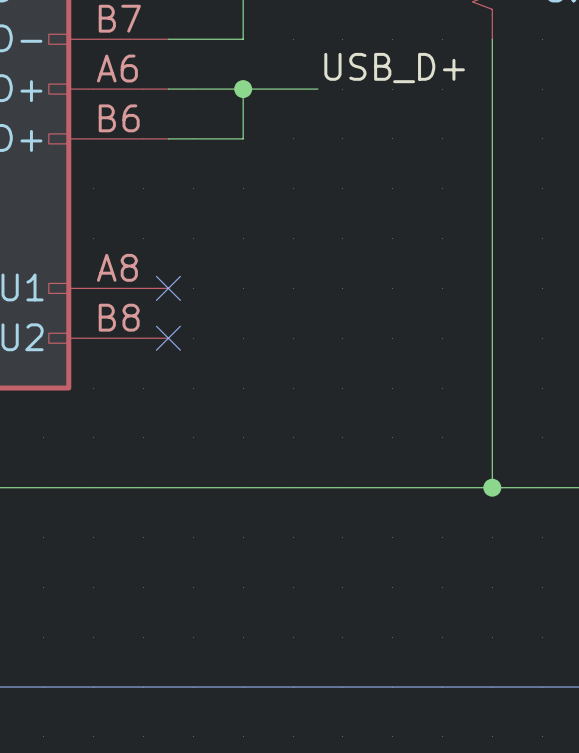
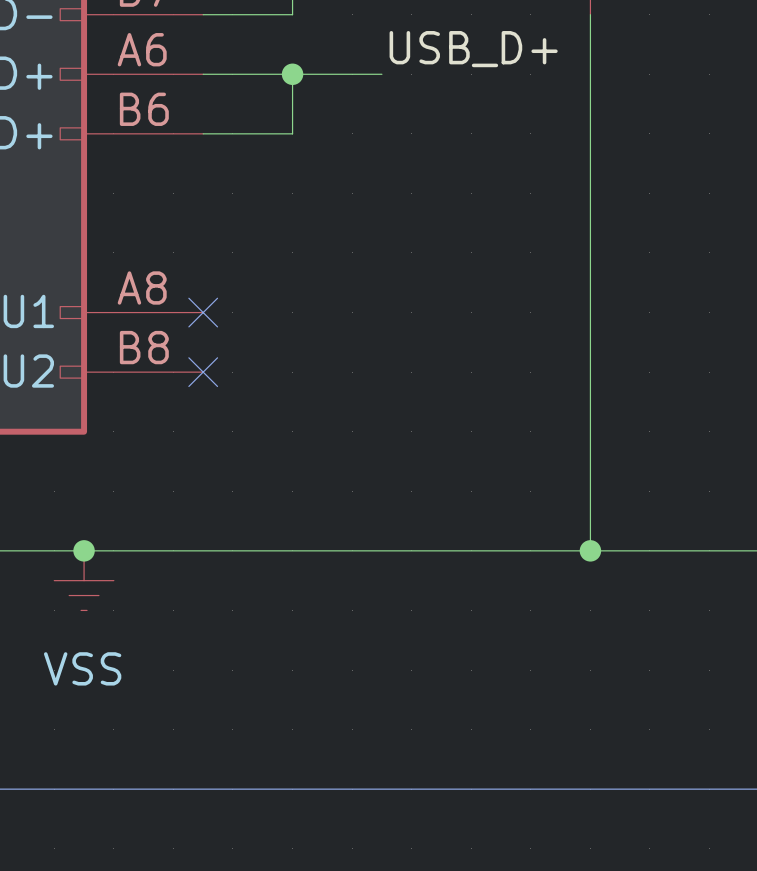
junction: none -> (84, 550)
power symbol: none -> VSS (84, 580)

